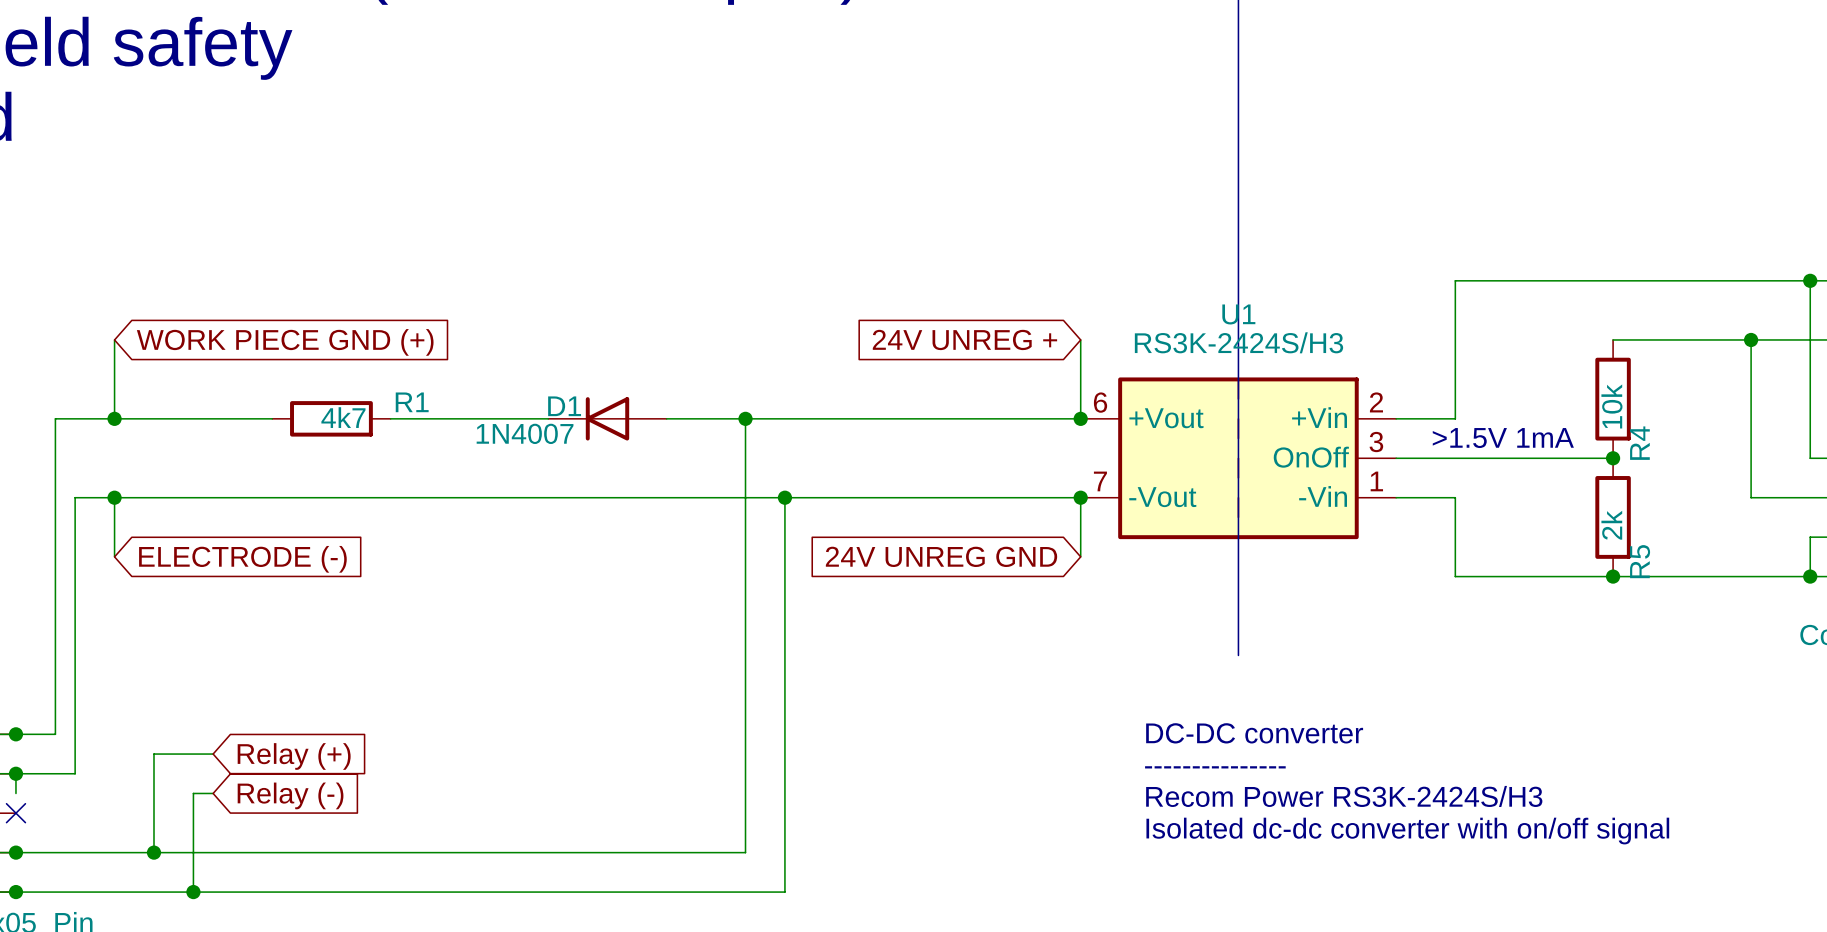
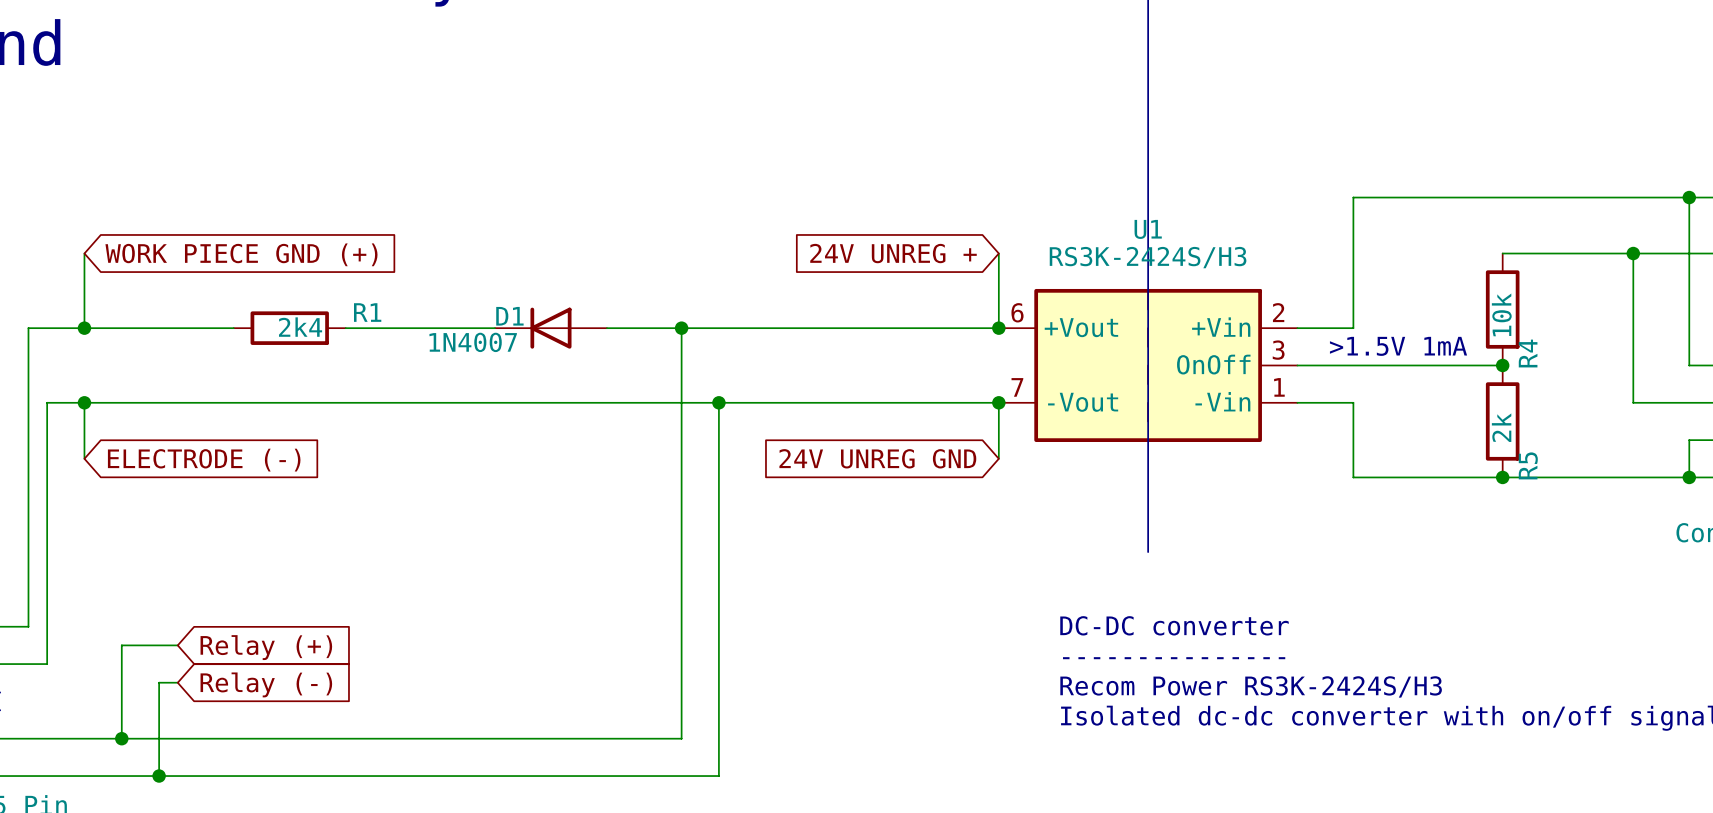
R1 value: 4k7 (343, 417) -> 2k4 (300, 327)

